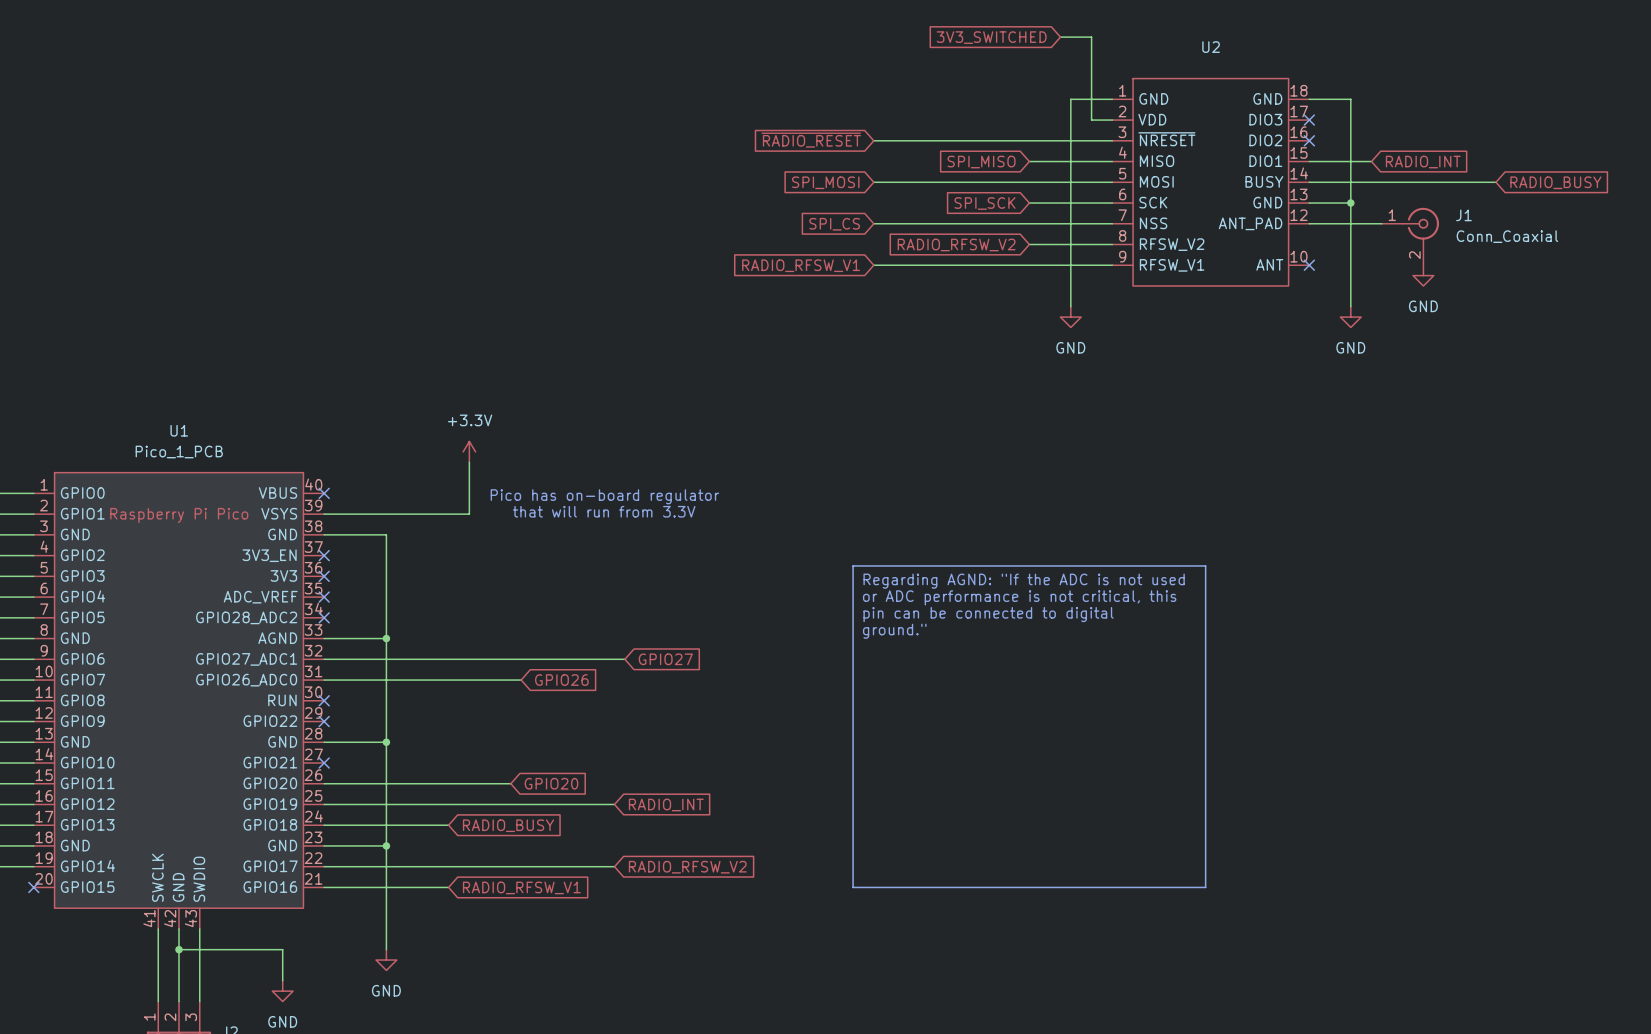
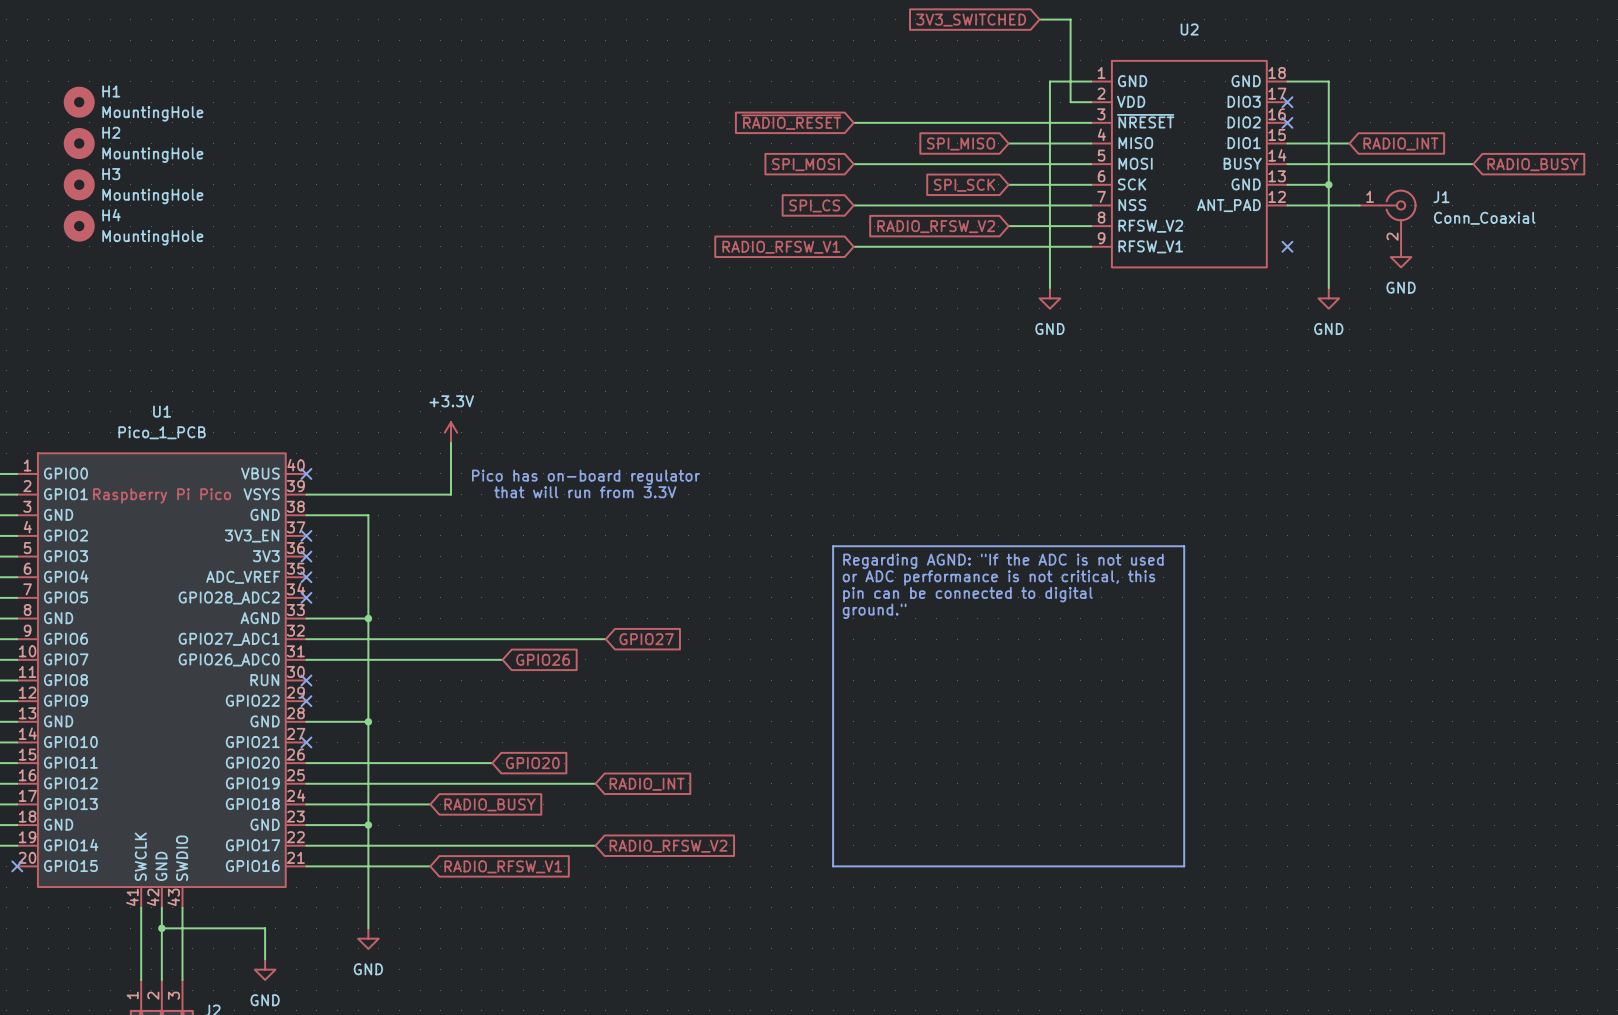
U2 symbol: [1112, 78, 1310, 286] -> [1091, 60, 1288, 268]
H1: none -> MountingHole (79, 102)
H2: none -> MountingHole (79, 143)
H3: none -> MountingHole (79, 184)
H4: none -> MountingHole (79, 226)

